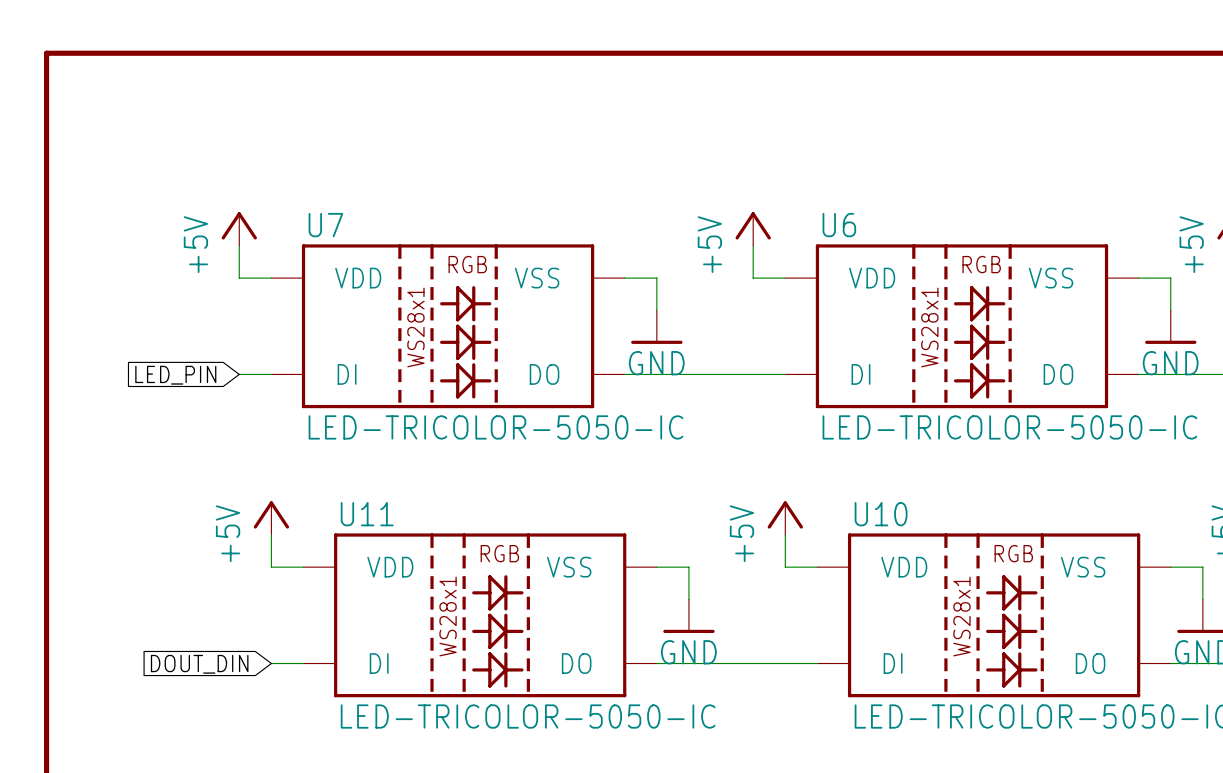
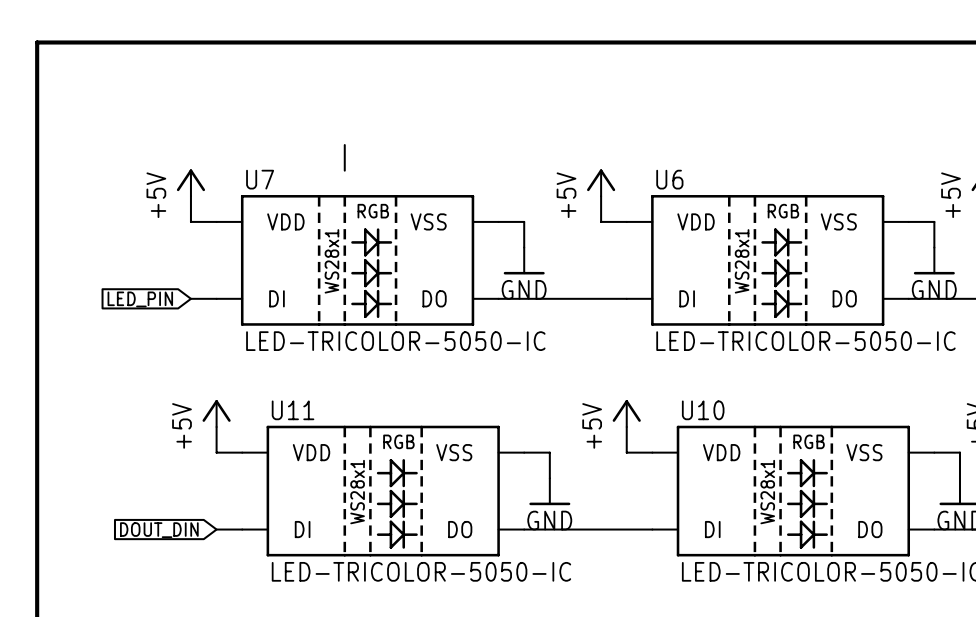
wire: none -> (344, 145) (344, 170)

